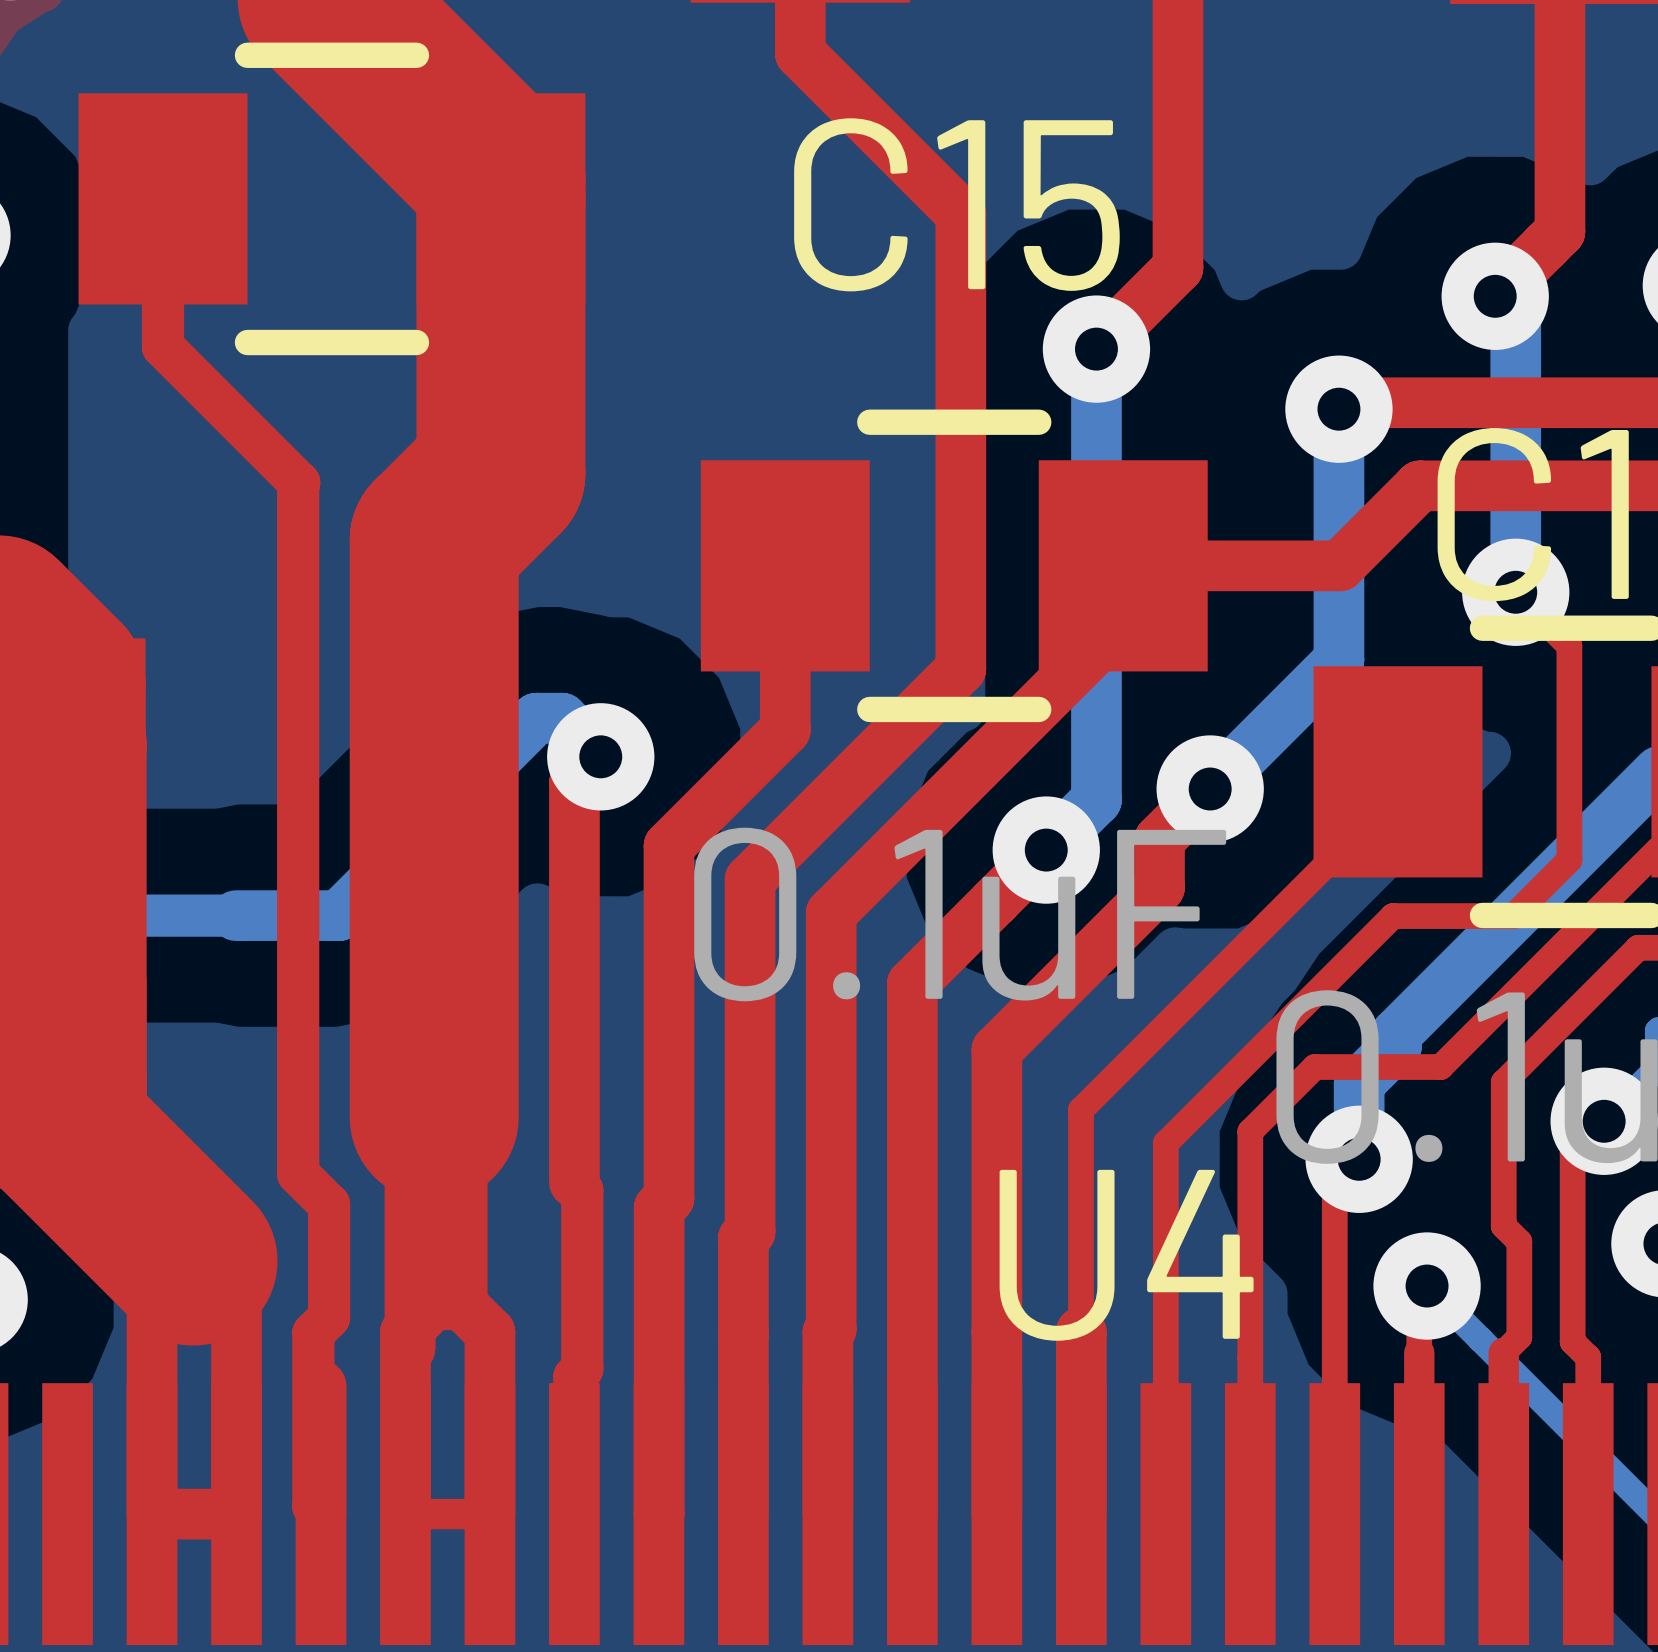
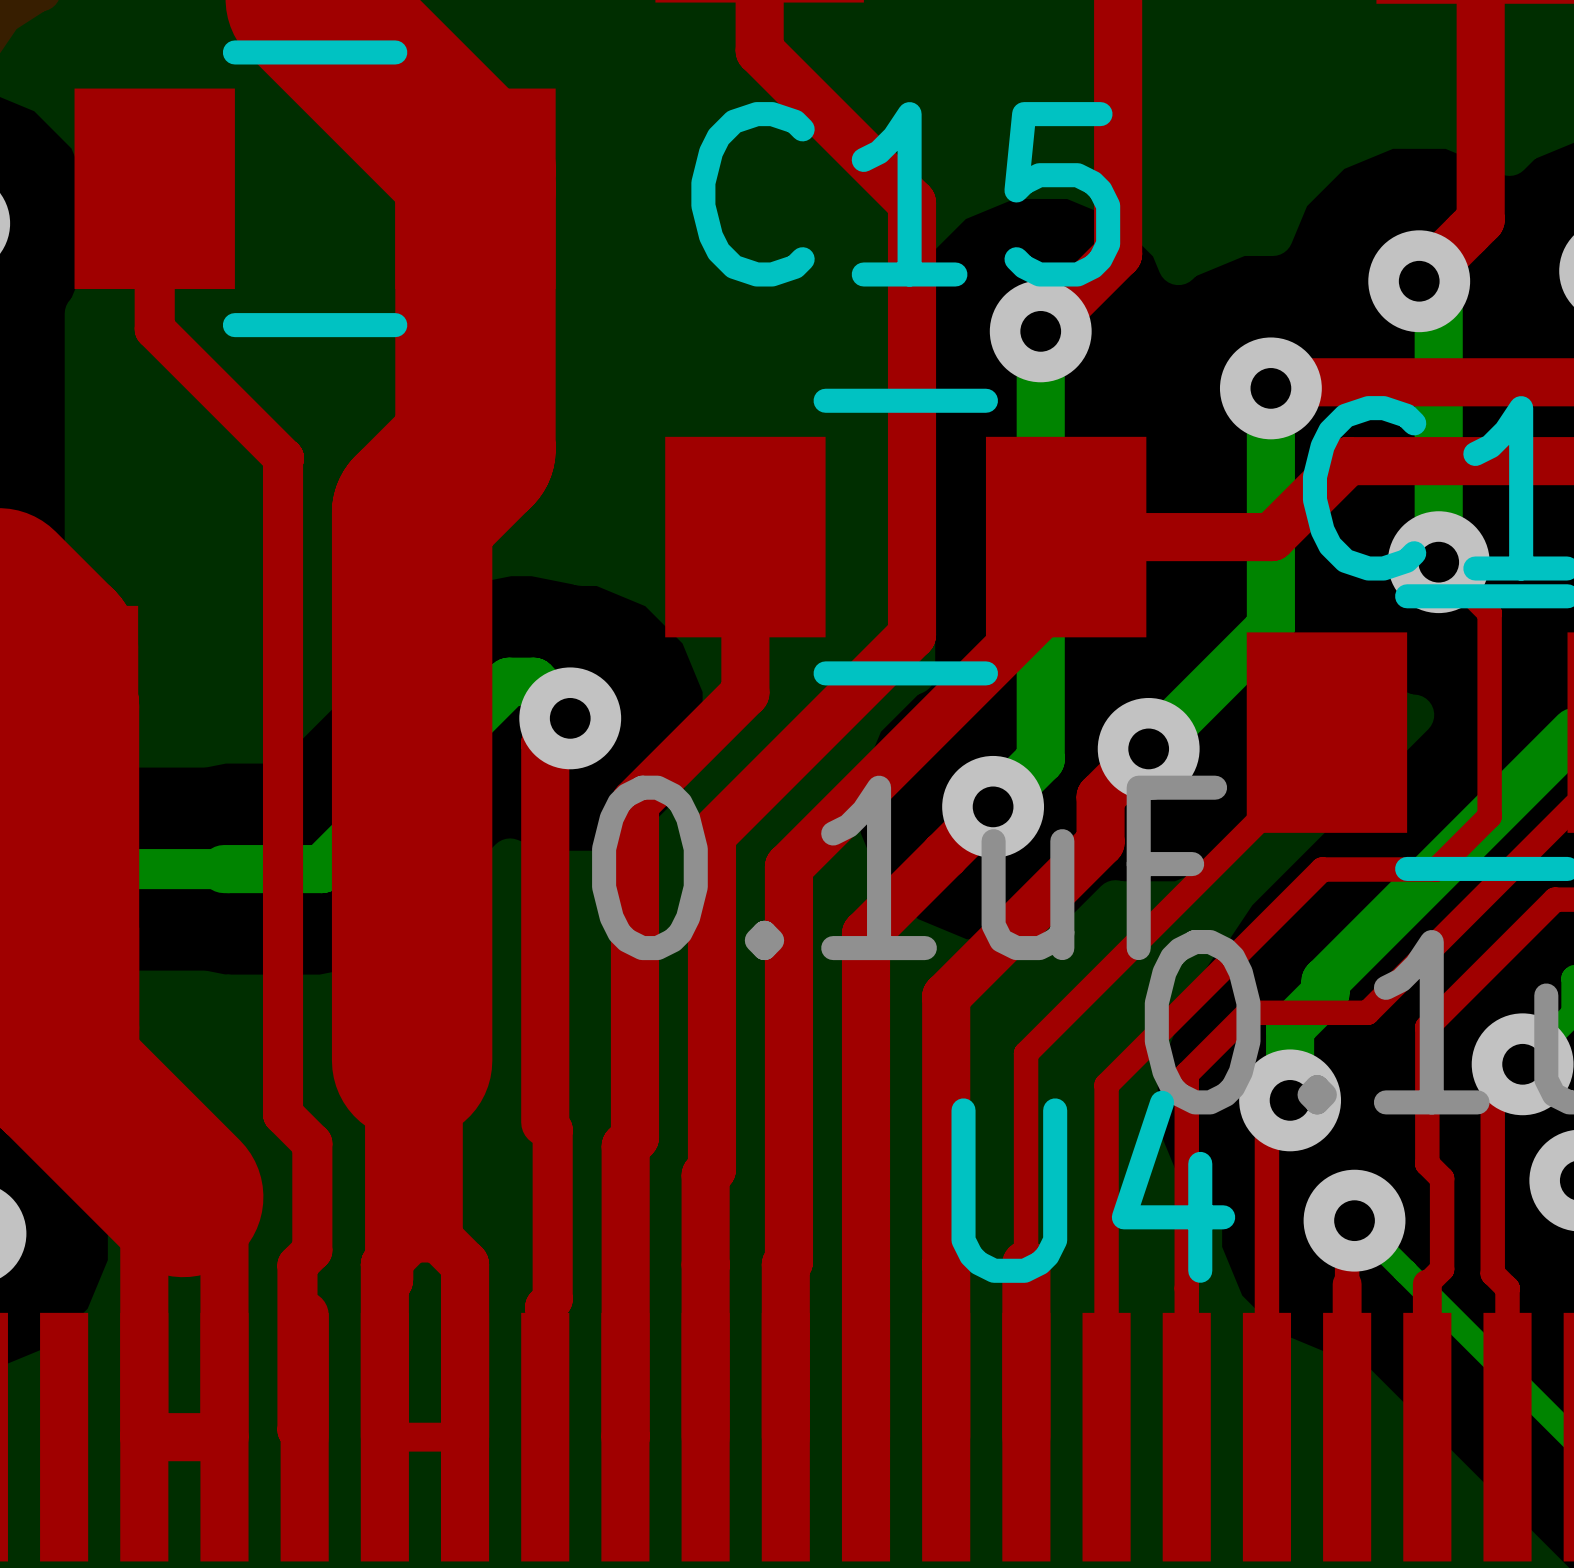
U4 name position: U4 (1126, 1255) -> U4 (1093, 1186)

